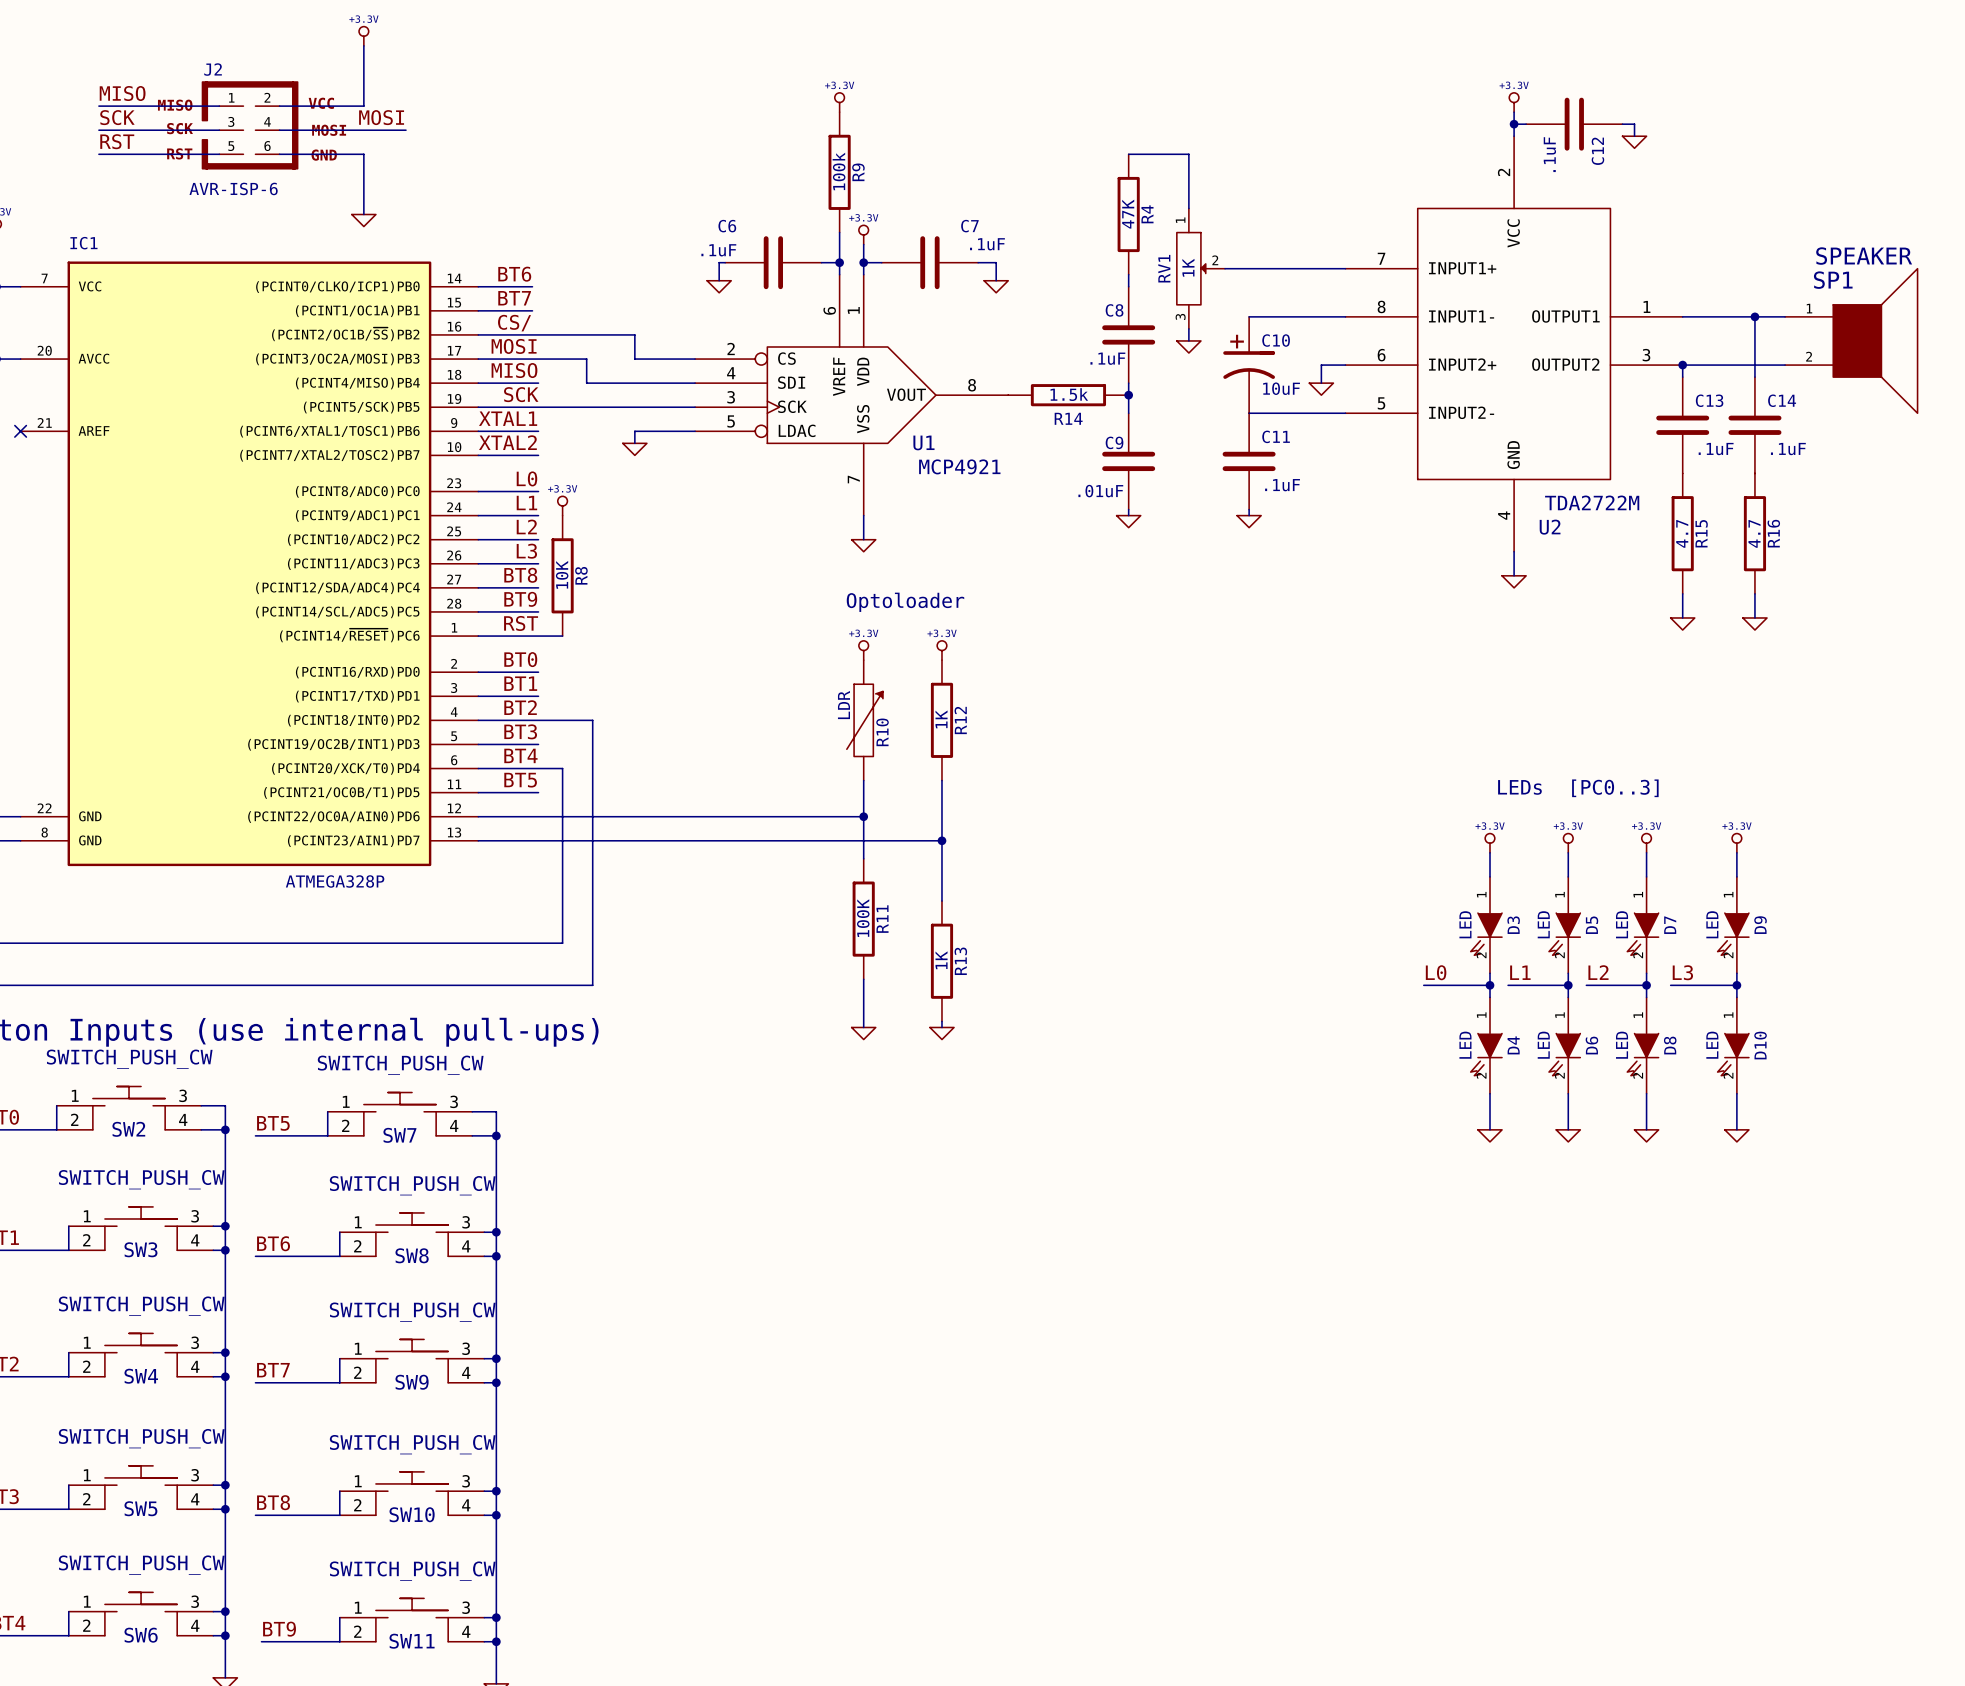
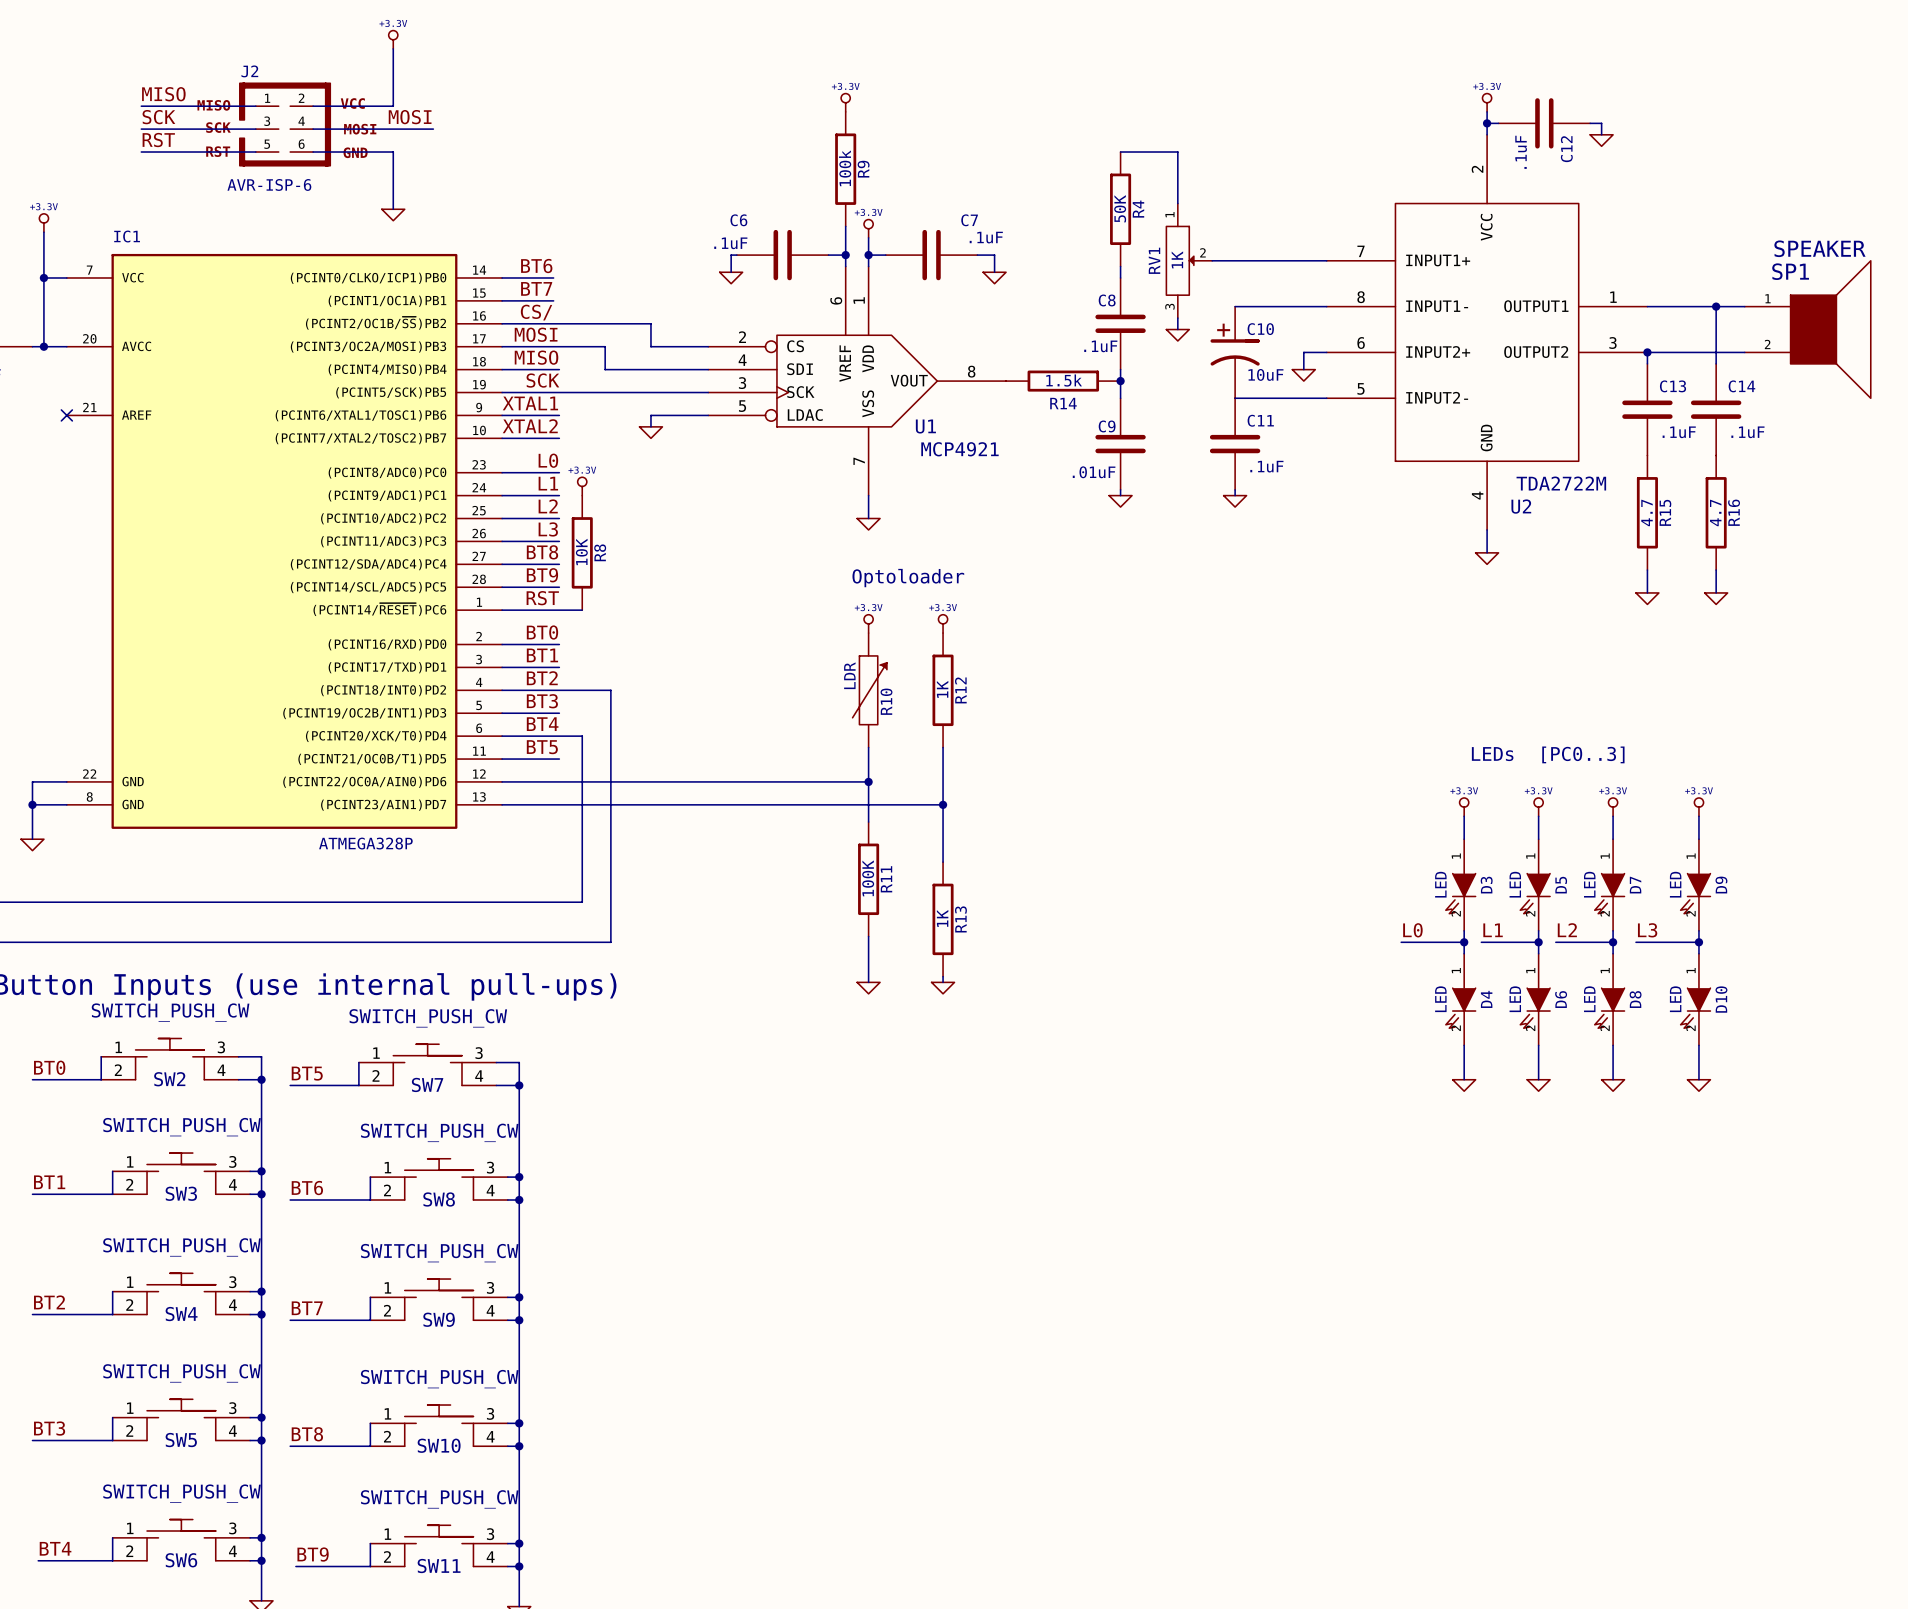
R4 value: 47K (1128, 214) -> 50K (1120, 208)

